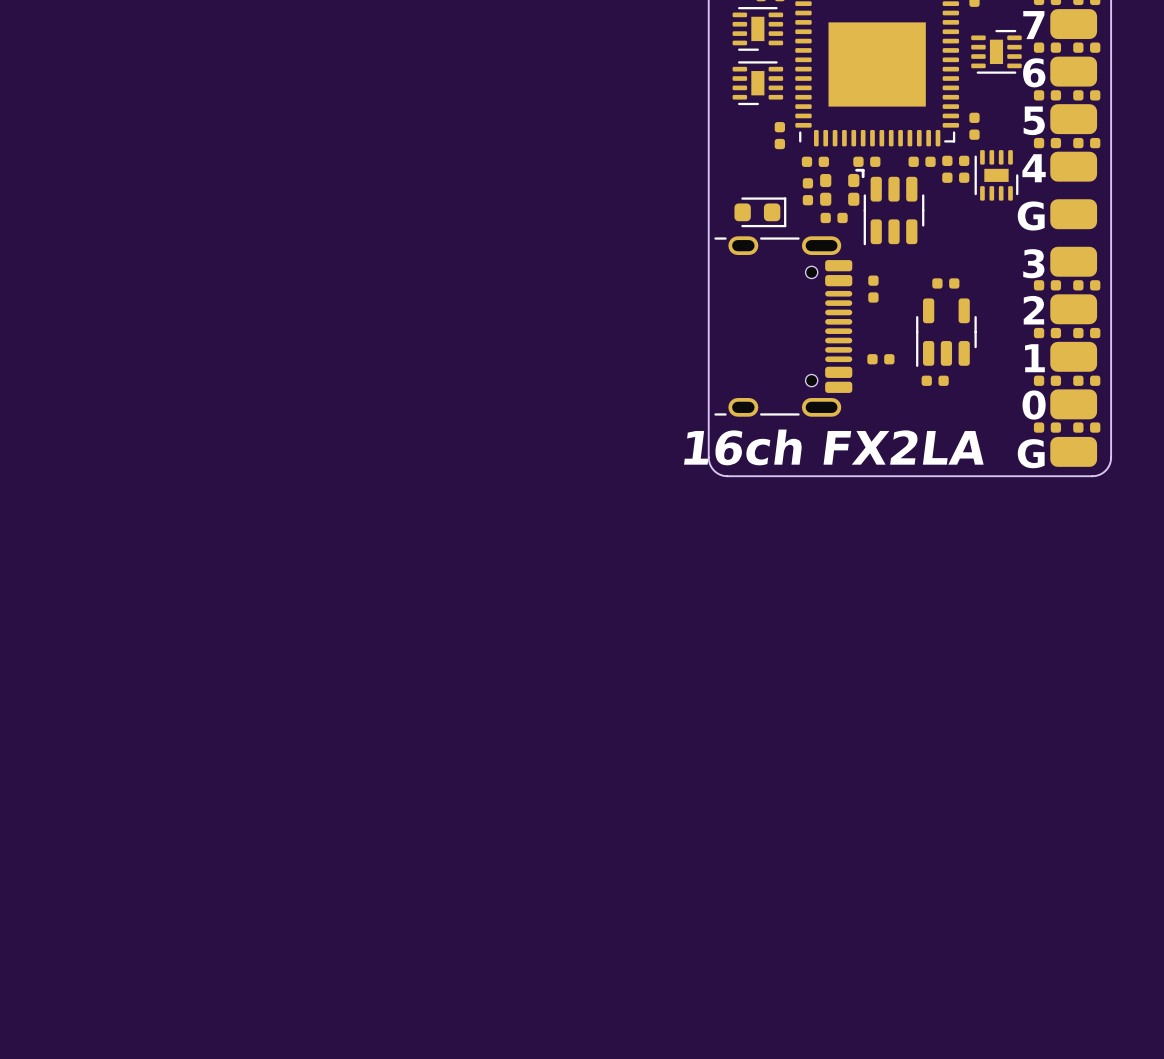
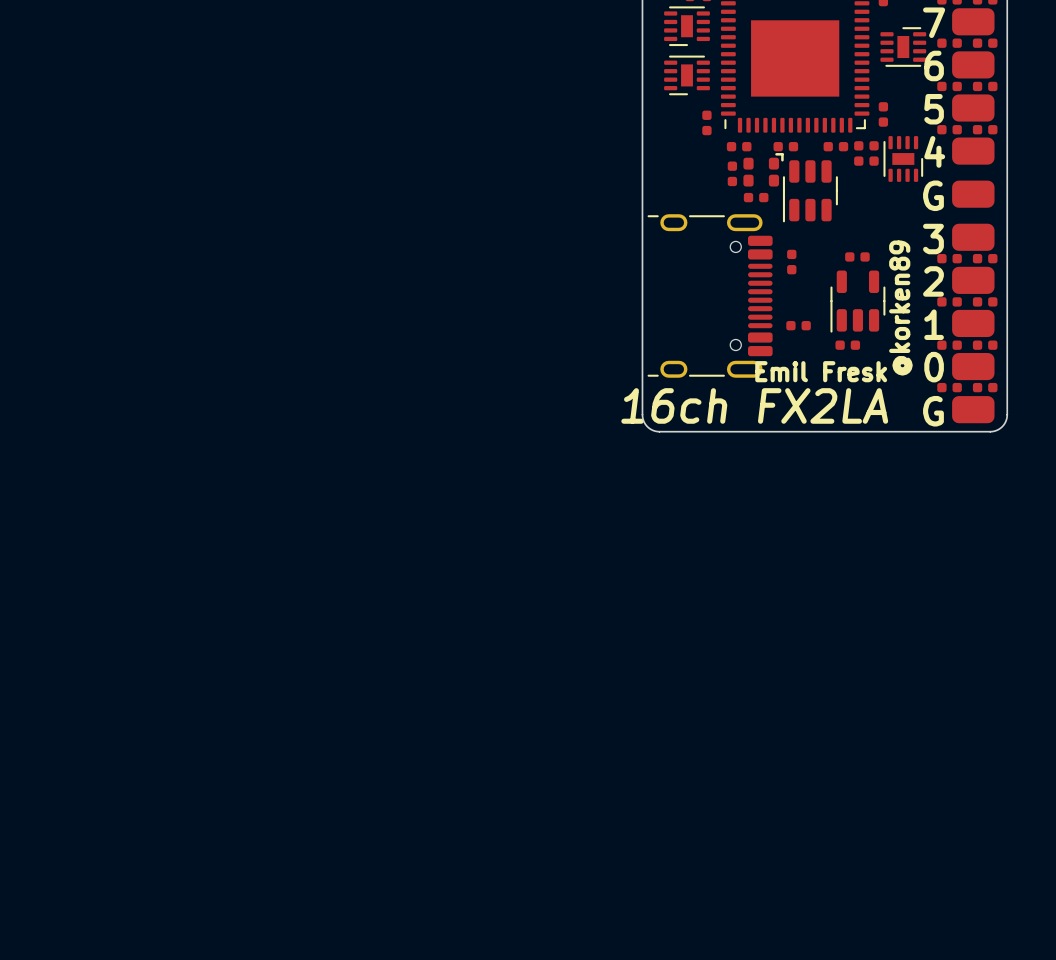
part: (760, 212) -> none
text: none -> @korken89 (900, 308)
text: none -> Emil Fresk (821, 371)

